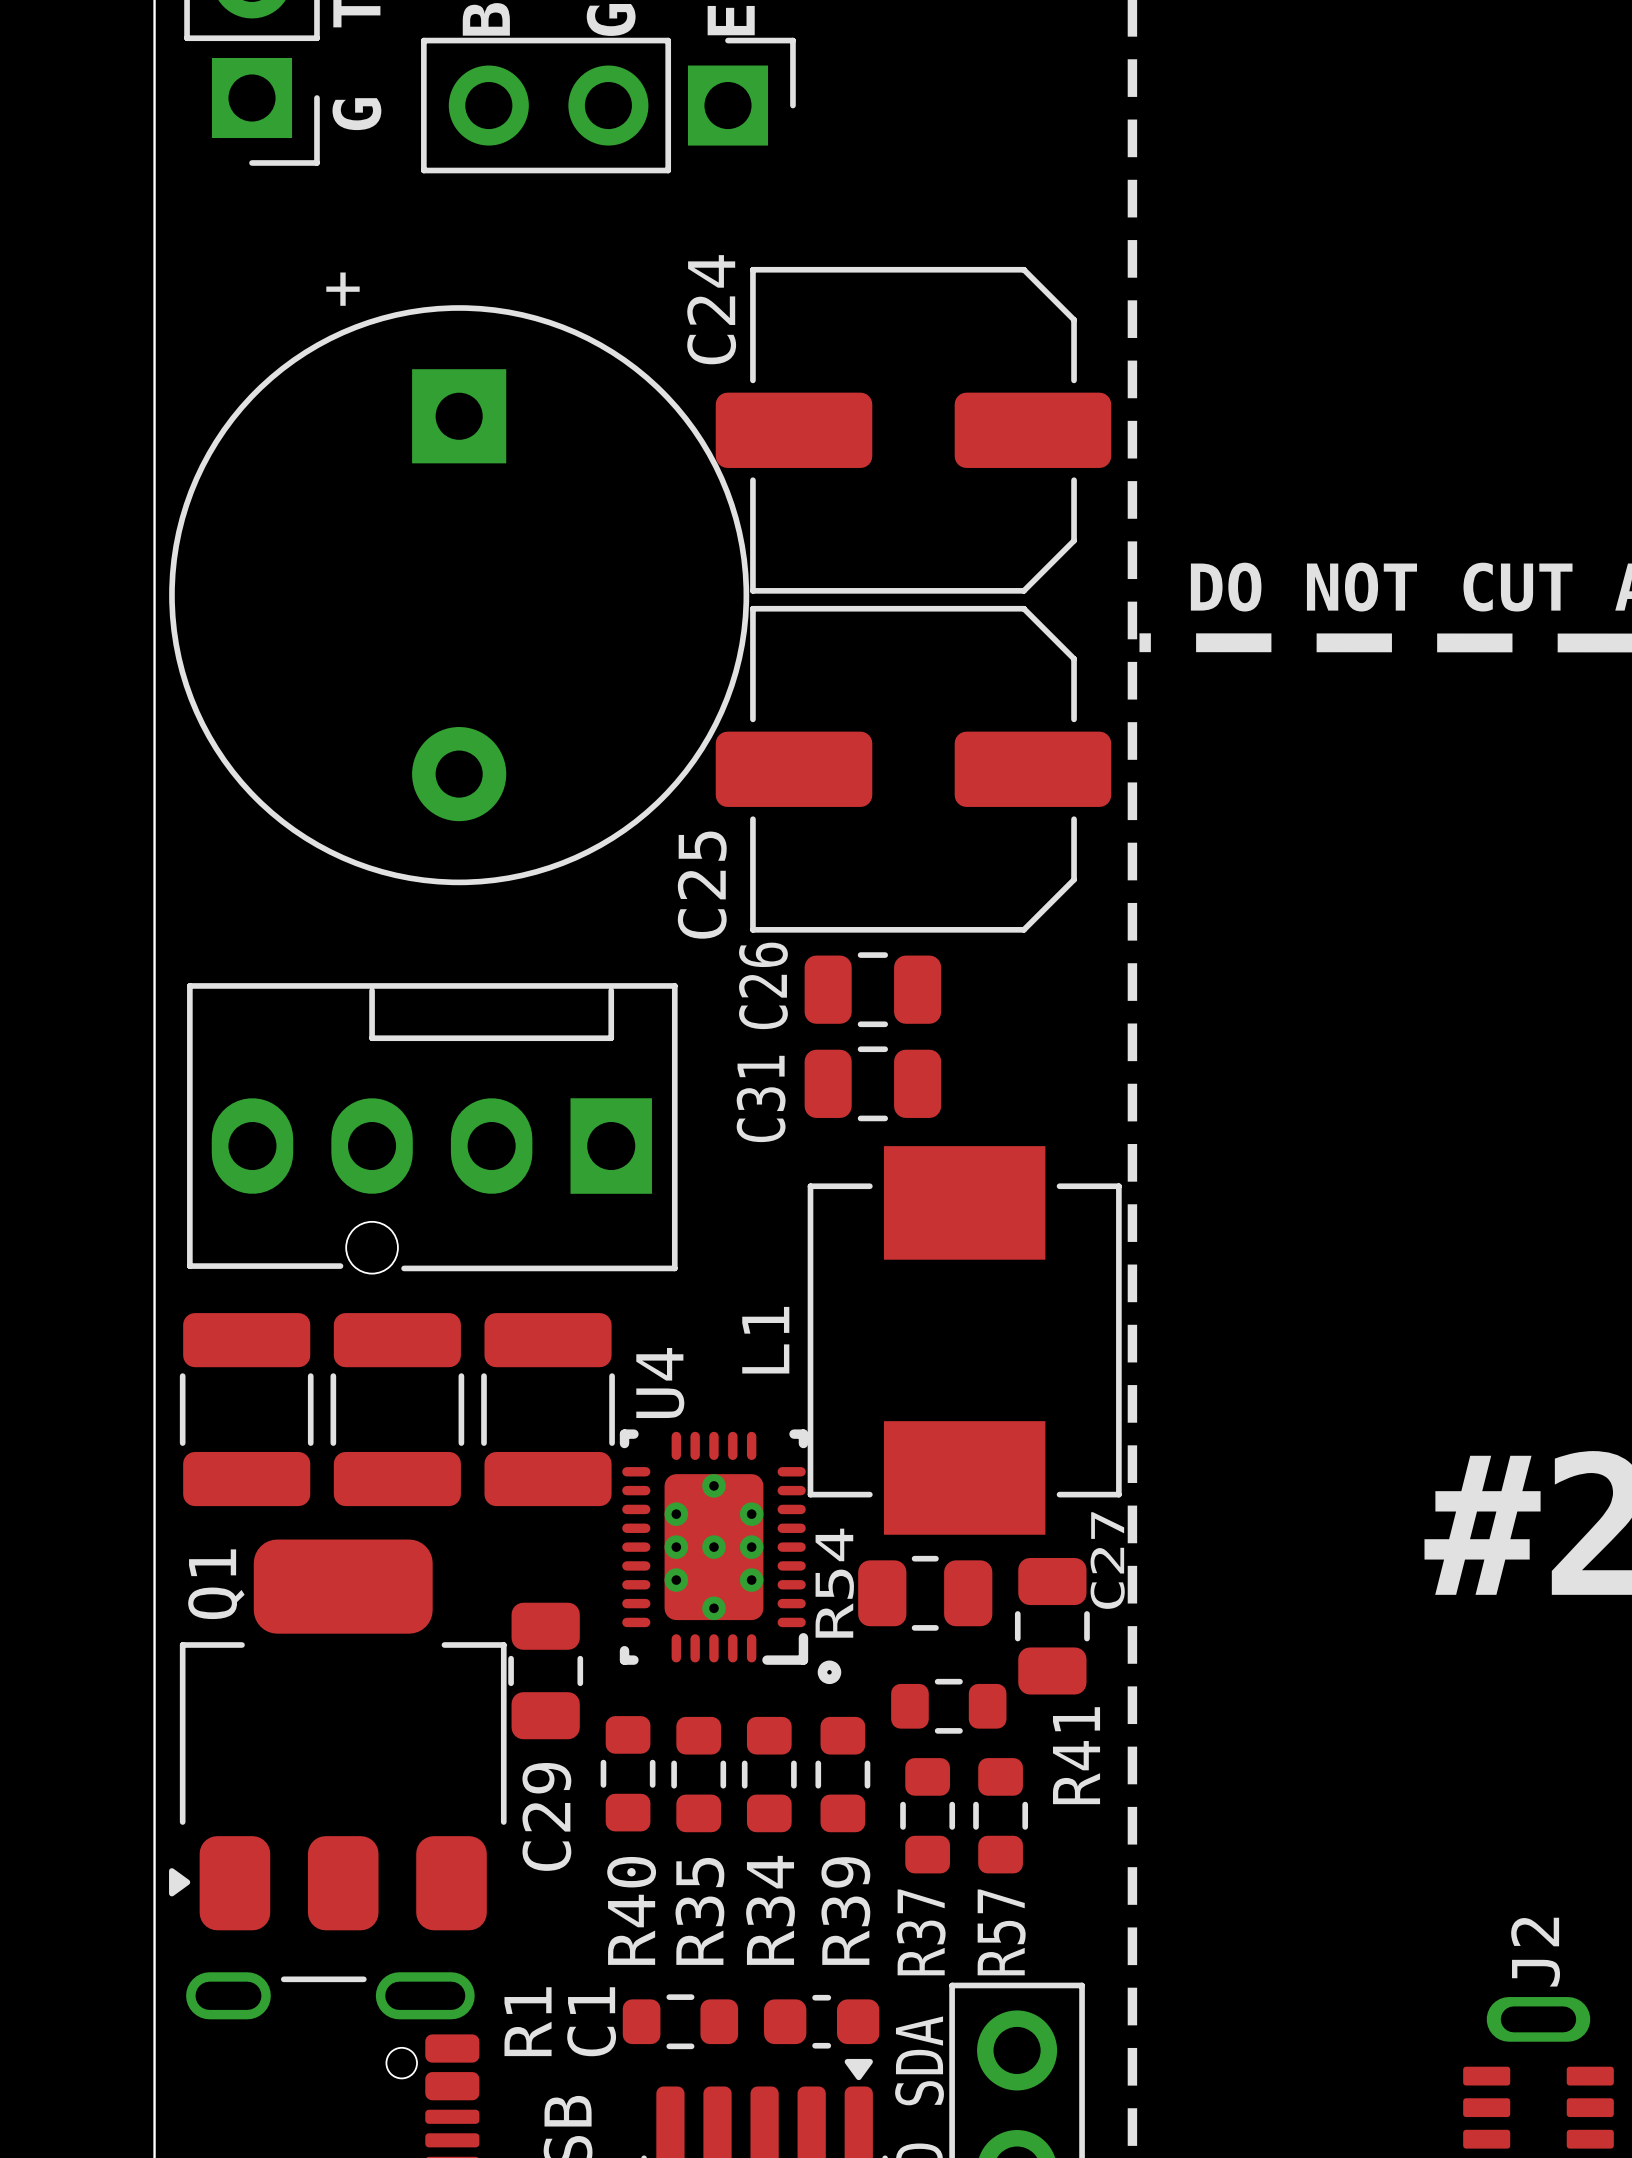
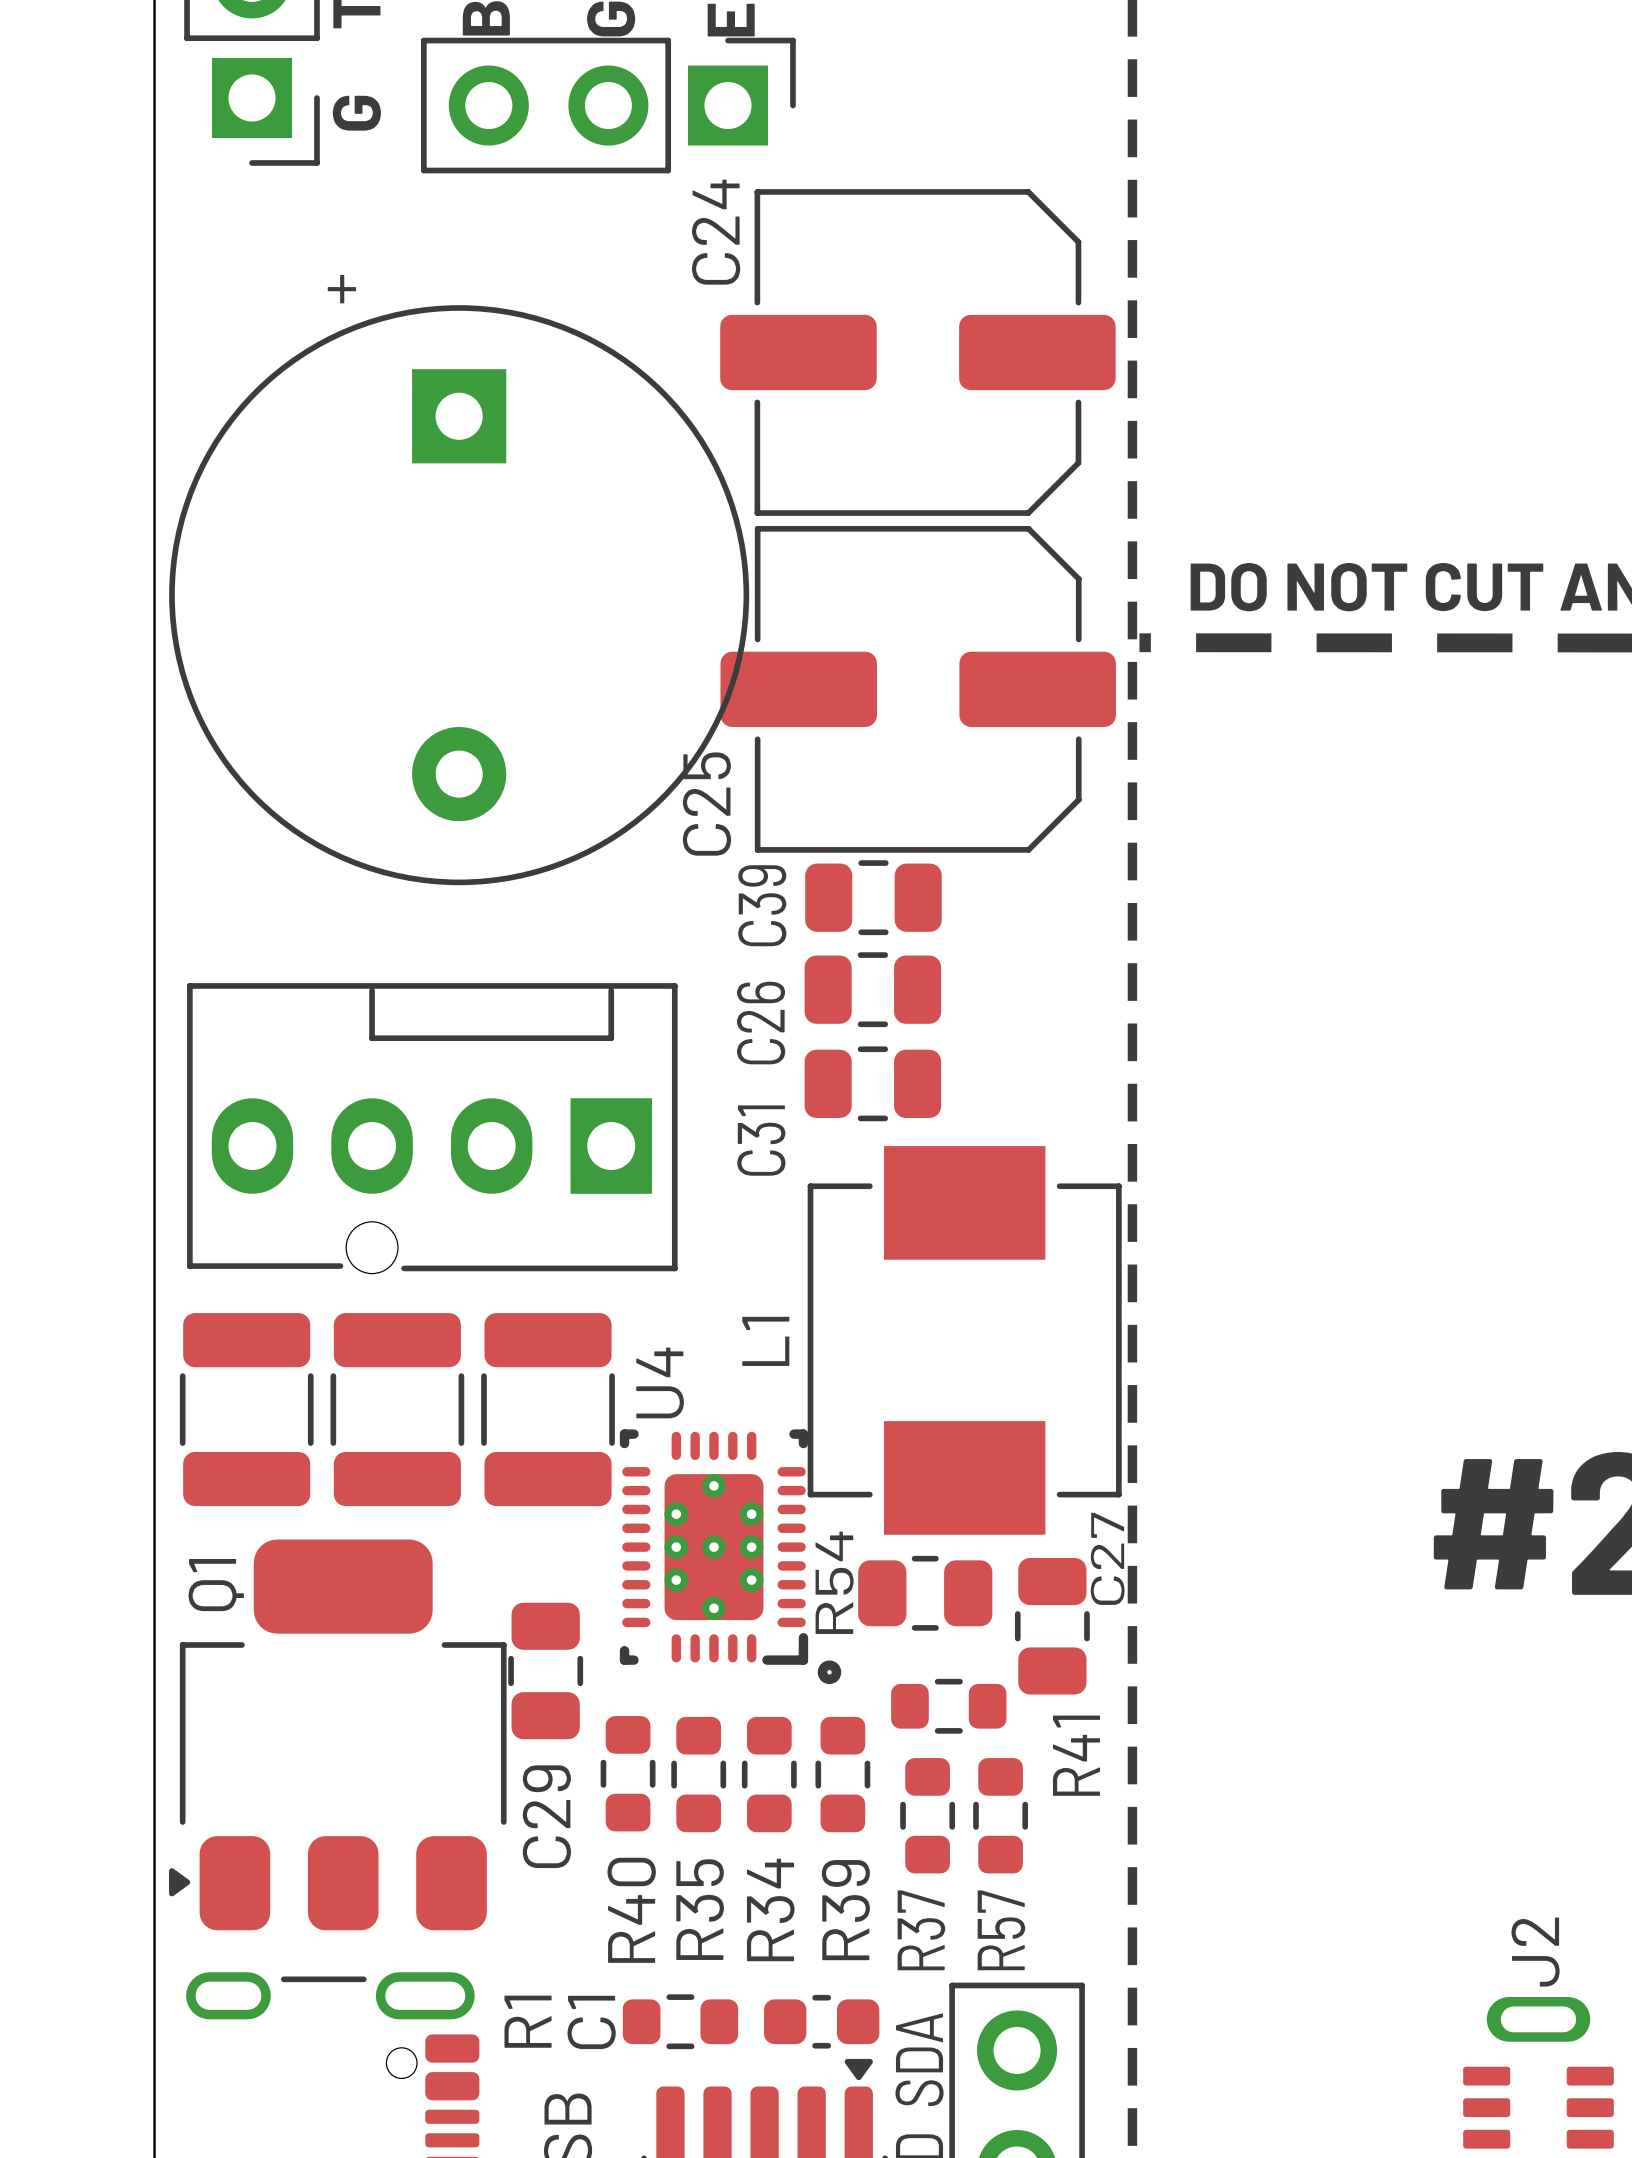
C24 position: (913, 430) -> (917, 352)
C25 position: (913, 769) -> (918, 689)
C39: none -> (873, 897)
C26 name position: C26 (763, 985) -> C26 (761, 1023)
C31 name position: C31 (761, 1098) -> C31 (761, 1140)

